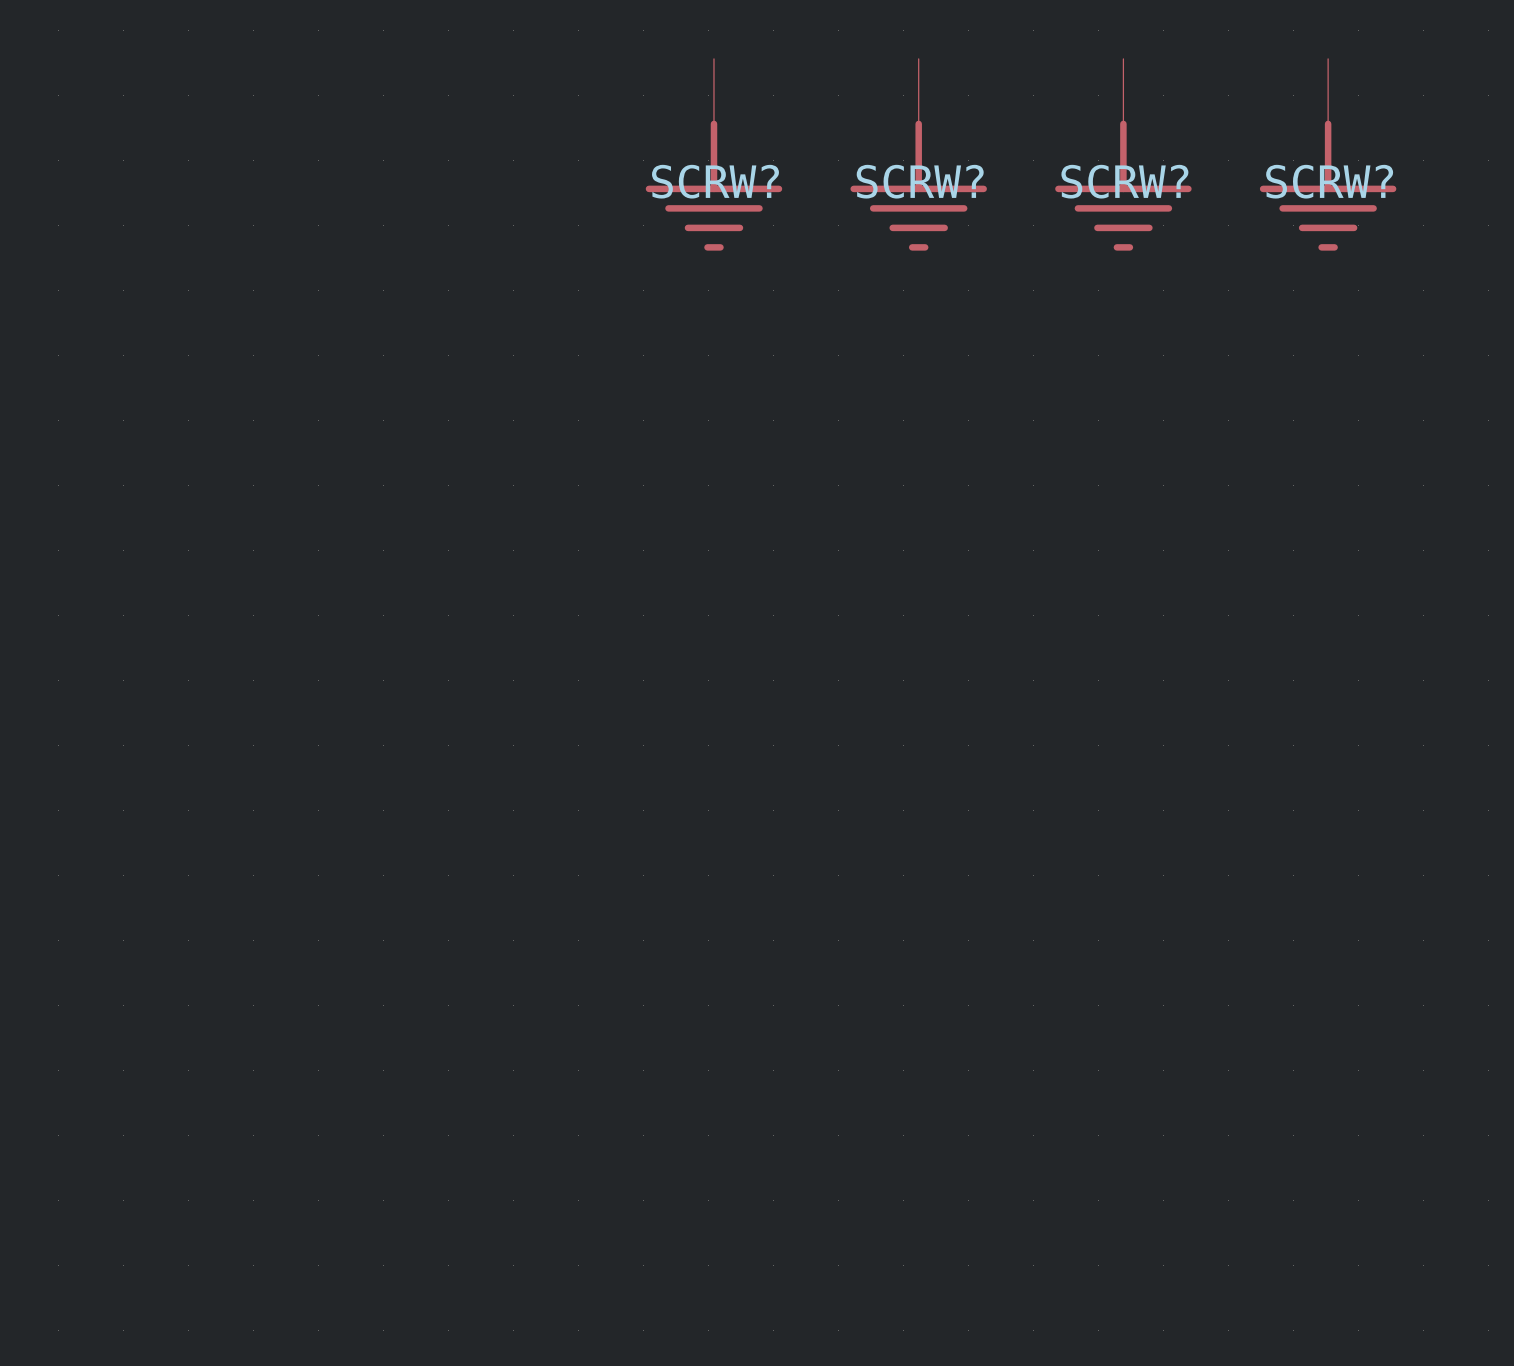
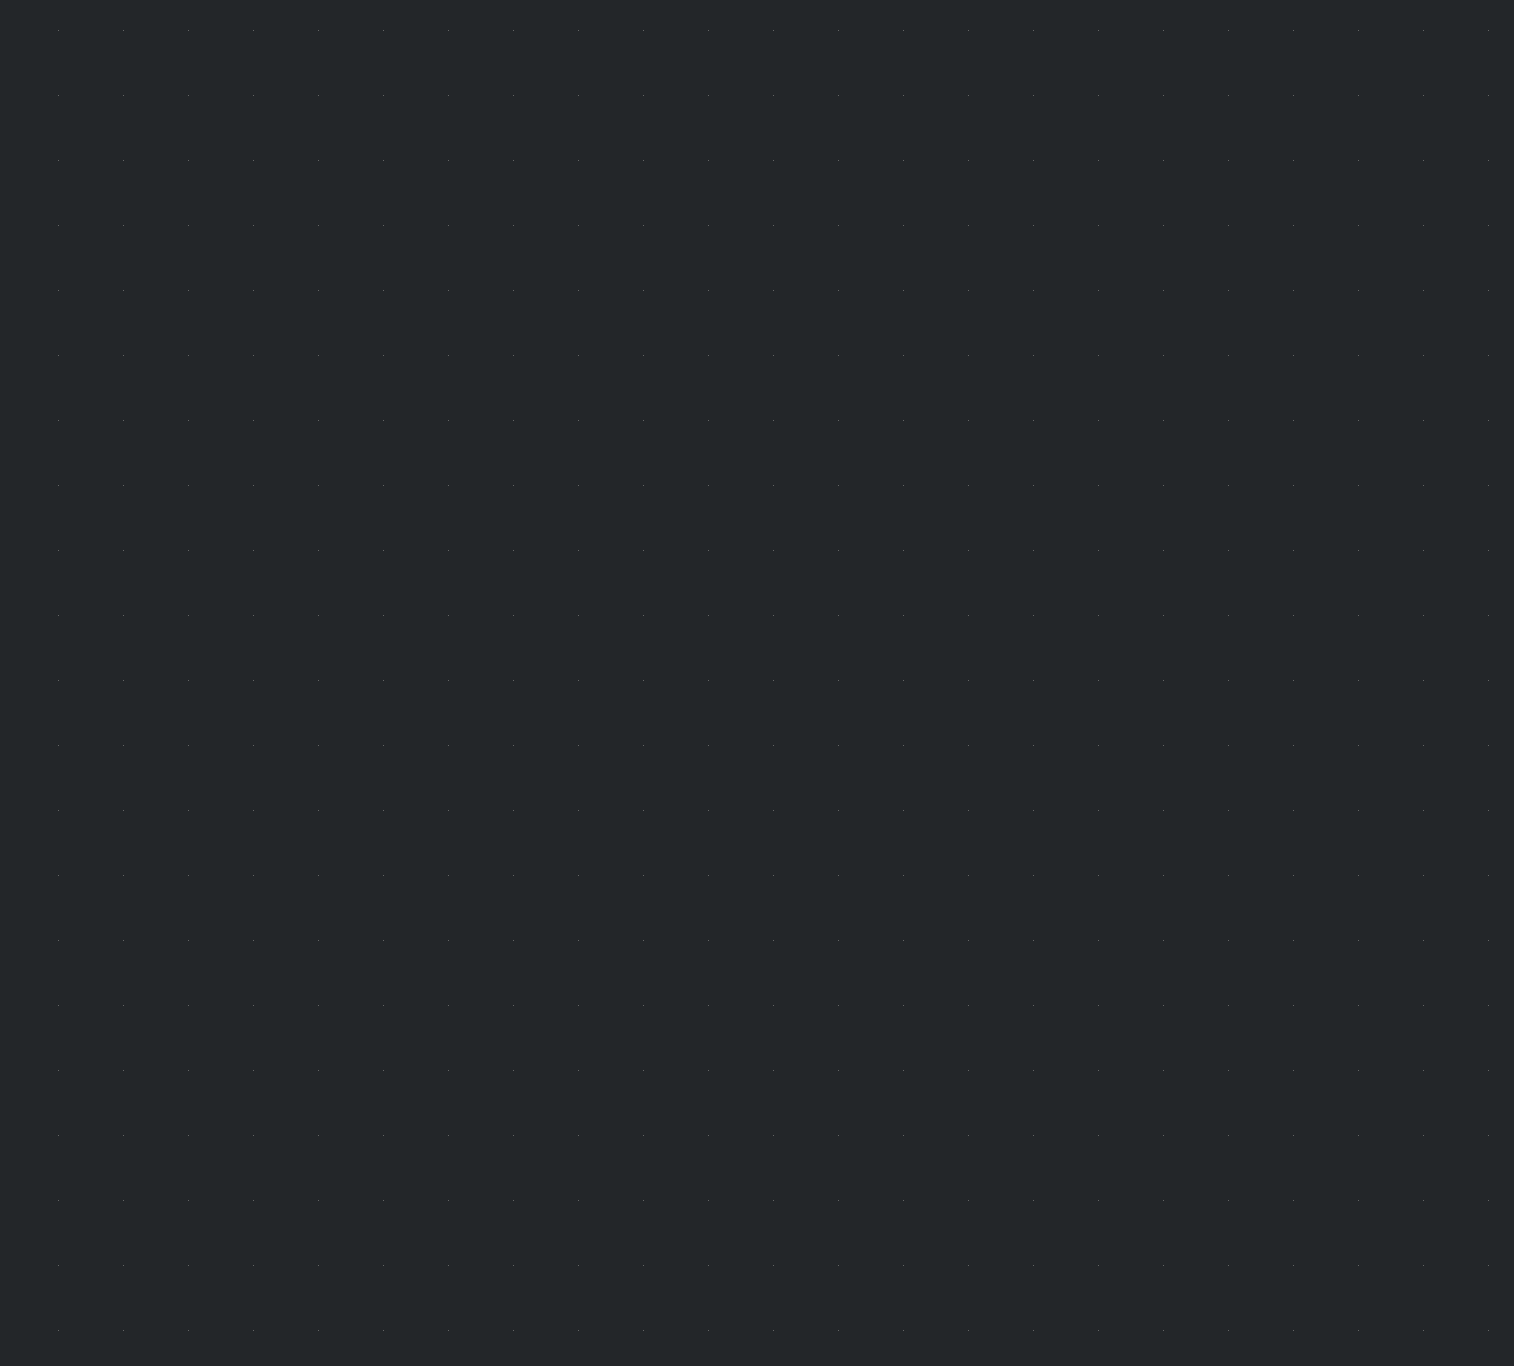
SCRW?: (713, 91) -> none
SCRW?: (918, 91) -> none
SCRW?: (1123, 91) -> none
SCRW?: (1328, 91) -> none
power symbol: (713, 185) -> none
power symbol: (918, 185) -> none
power symbol: (1123, 185) -> none
power symbol: (1328, 185) -> none

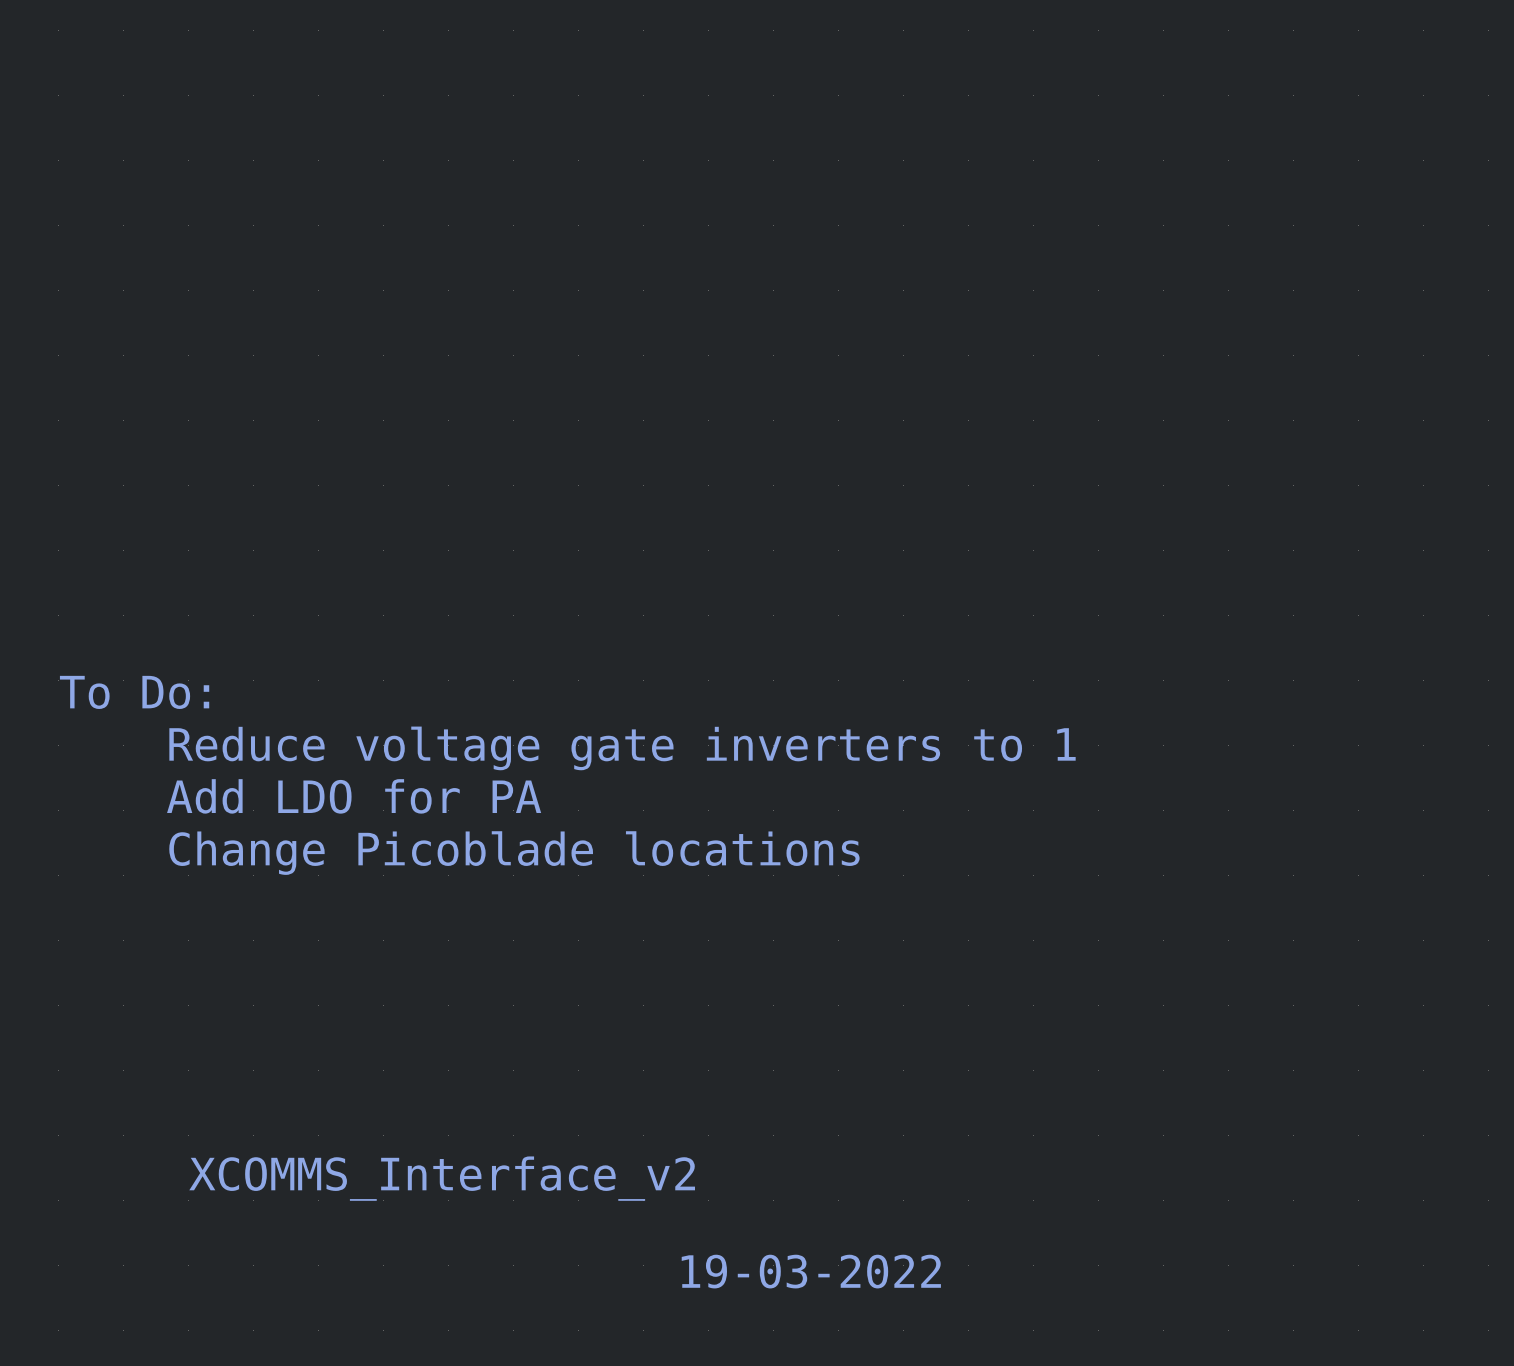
text: none -> To Do: (134, 692)
text: none -> Reduce voltage gate inverters to 1 (622, 748)
text: none -> Add LDO for PA (354, 796)
text: none -> Change Picoblade locations (514, 853)
text: none -> XCOMMS_Interface_v2 (442, 1178)
text: none -> 19-03-2022 (811, 1271)

